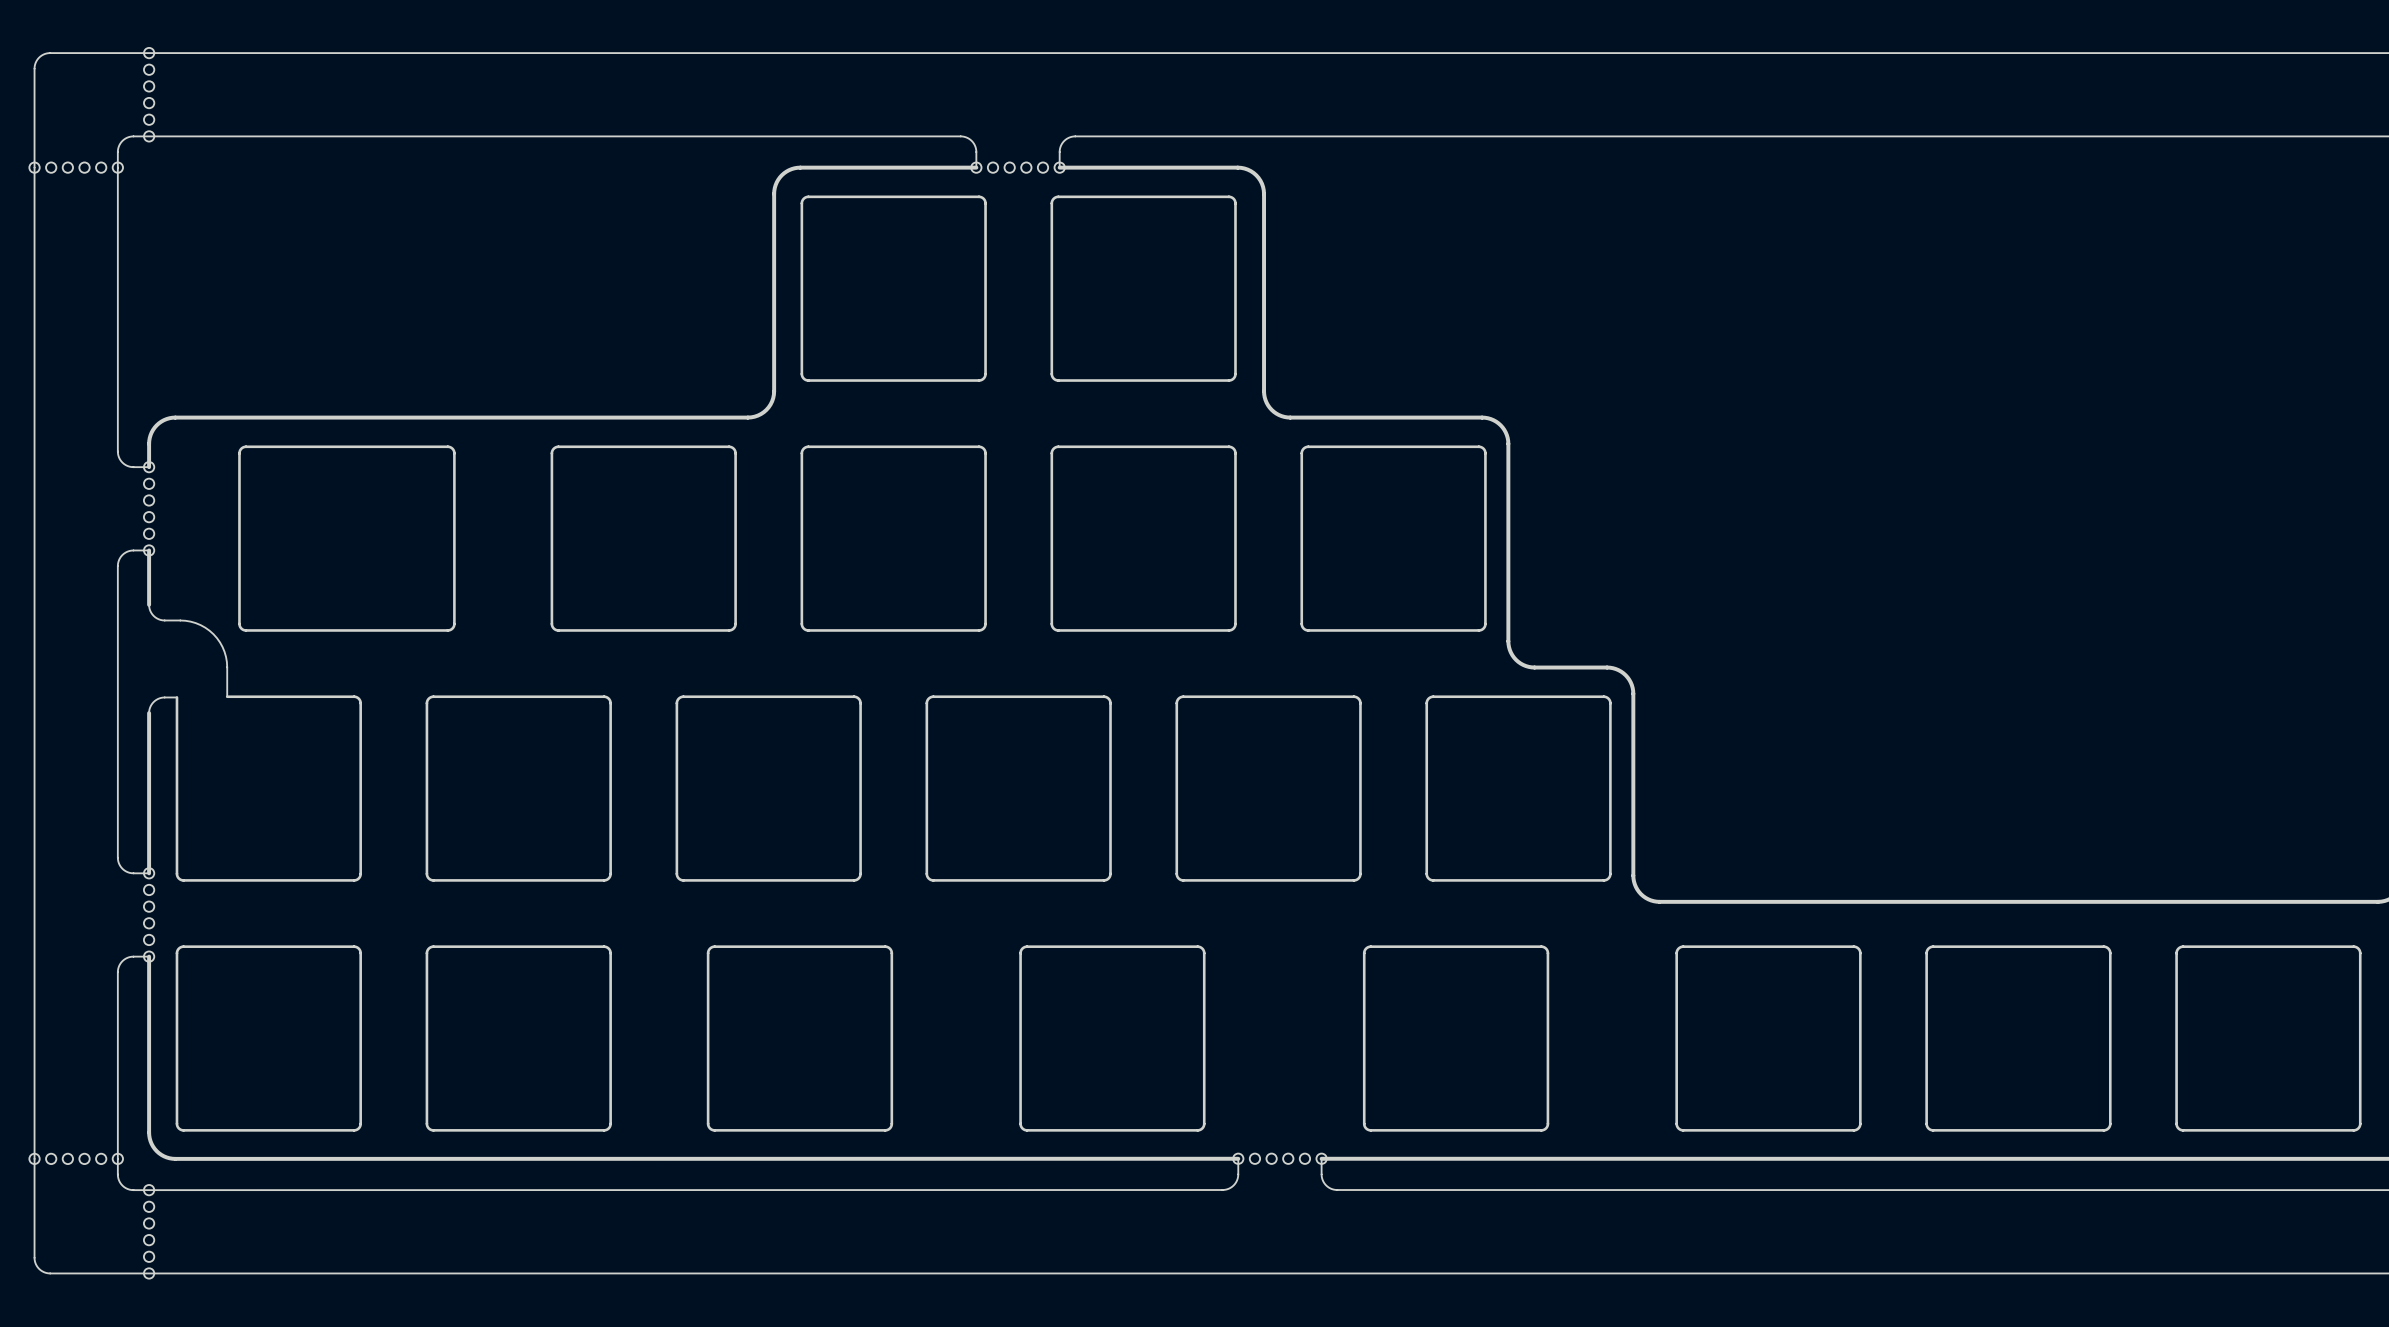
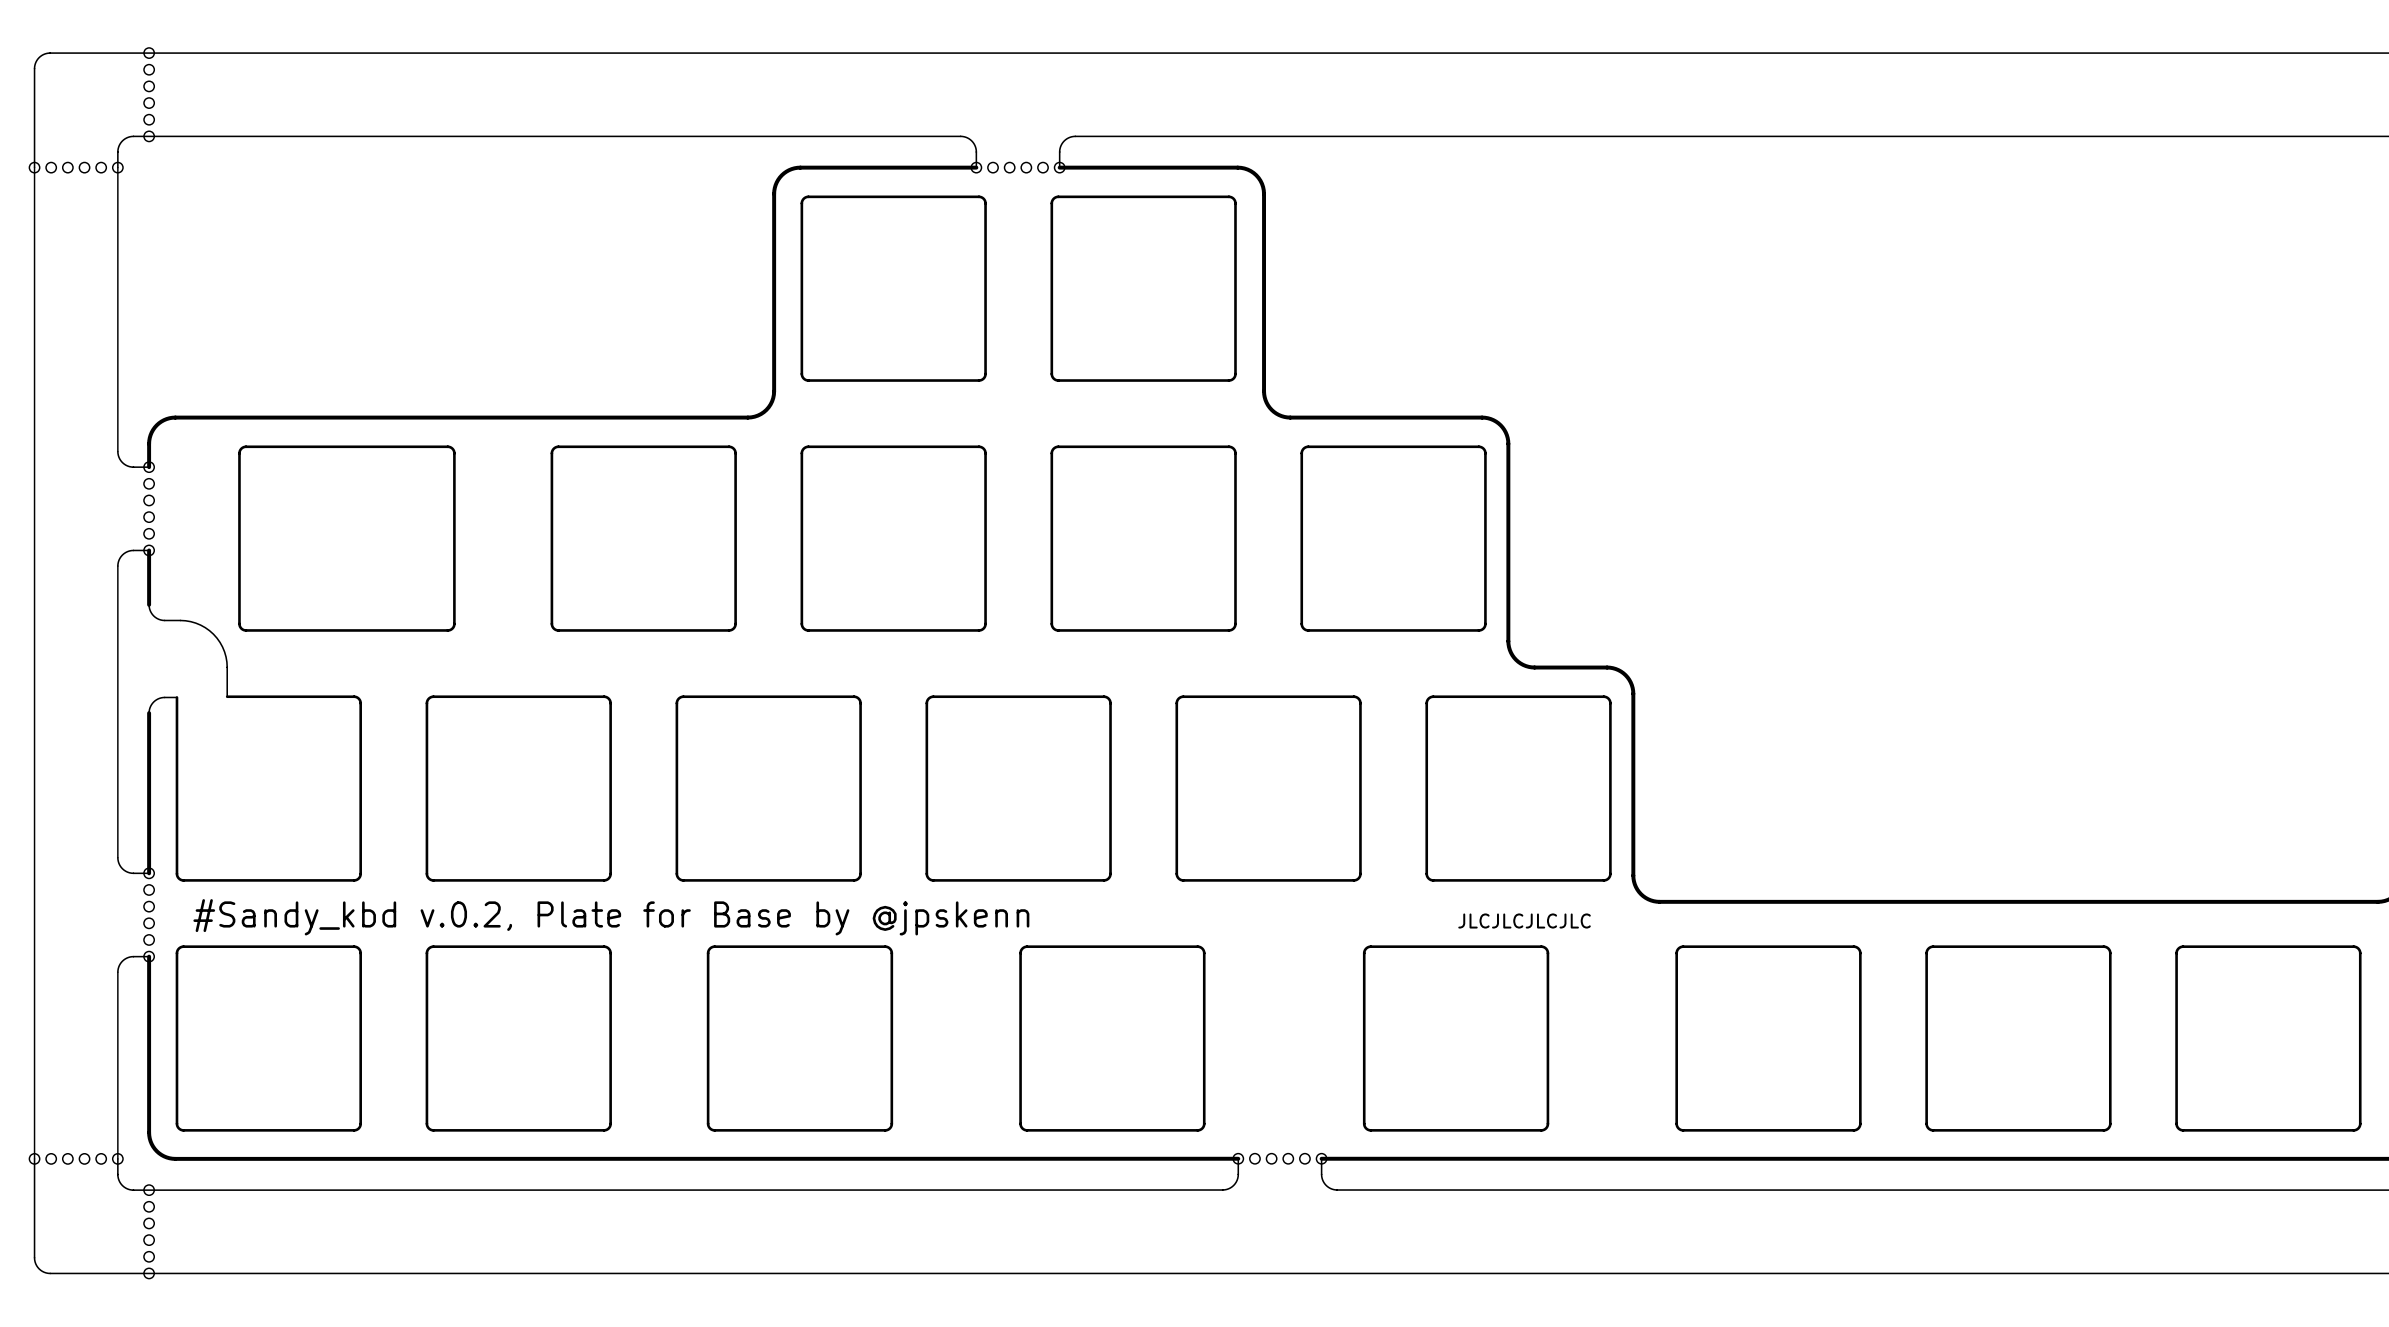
text: none -> #Sandy_kbd v.0.2, Plate for Base by @jpskenn (611, 917)
text: none -> JLCJLCJLCJLC (1524, 921)

